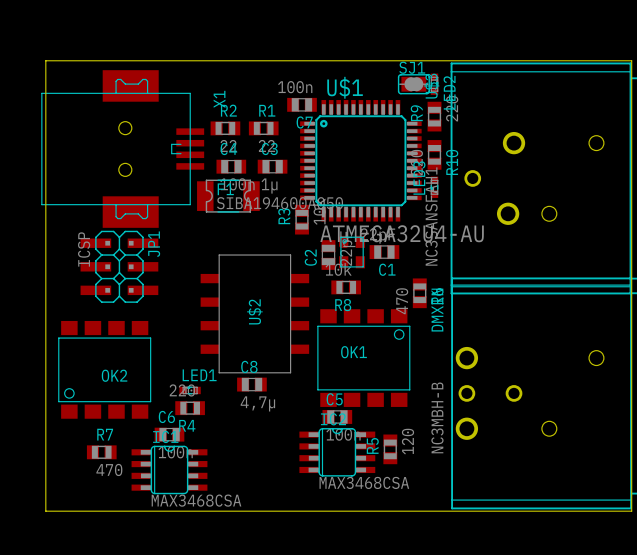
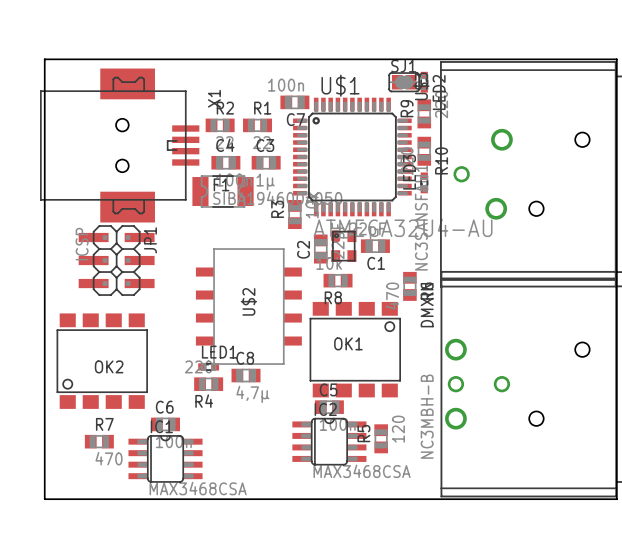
LED1 position: (190, 390) -> (208, 366)
R4 position: (190, 408) -> (208, 384)

